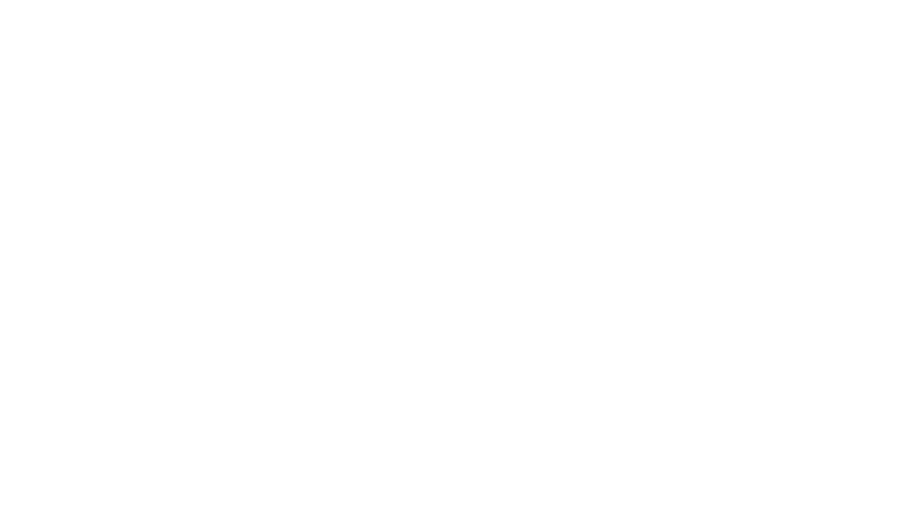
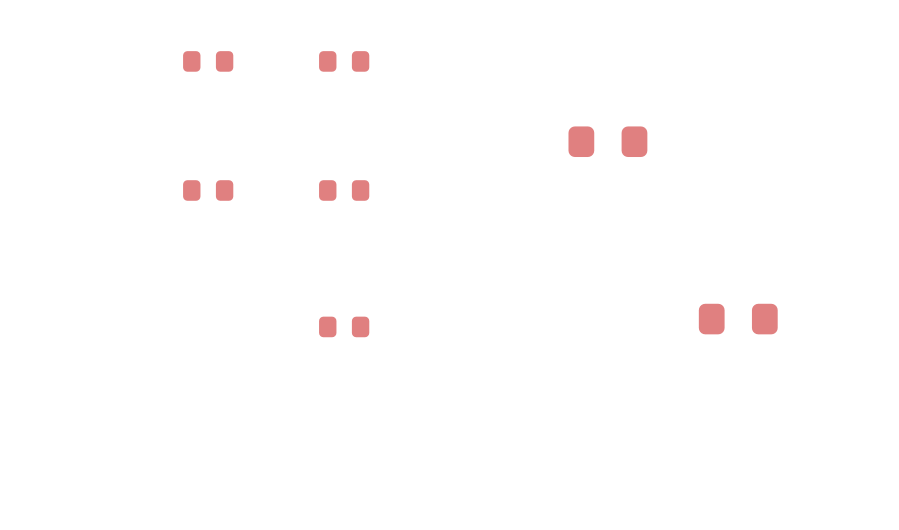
part: none -> (208, 61)
part: none -> (344, 61)
part: none -> (607, 141)
part: none -> (208, 190)
part: none -> (344, 190)
part: none -> (738, 319)
part: none -> (344, 326)

